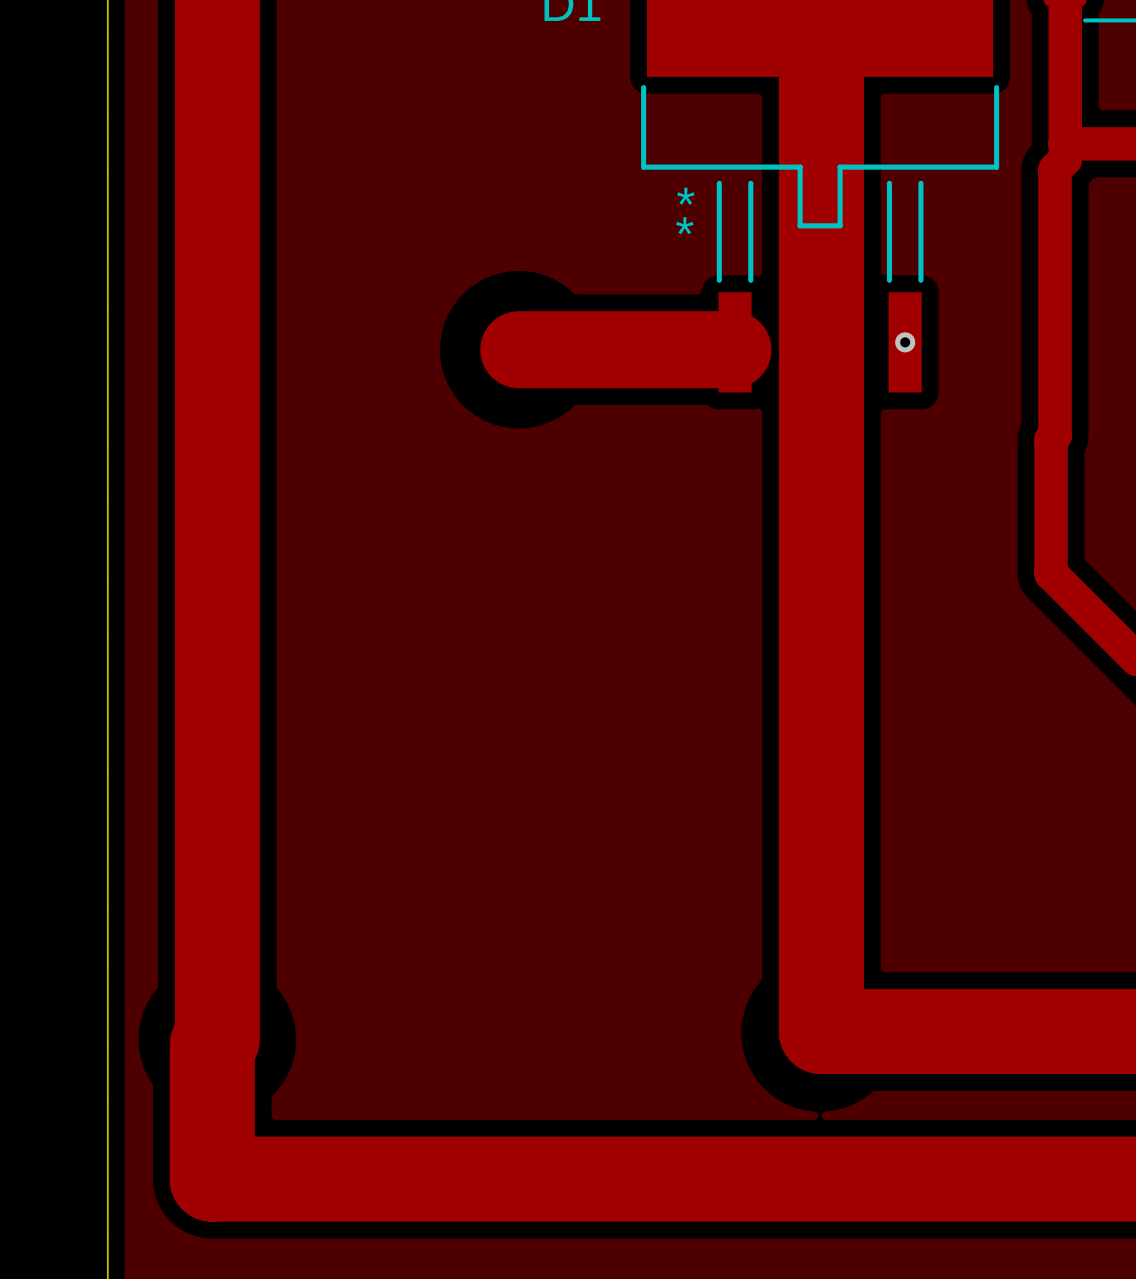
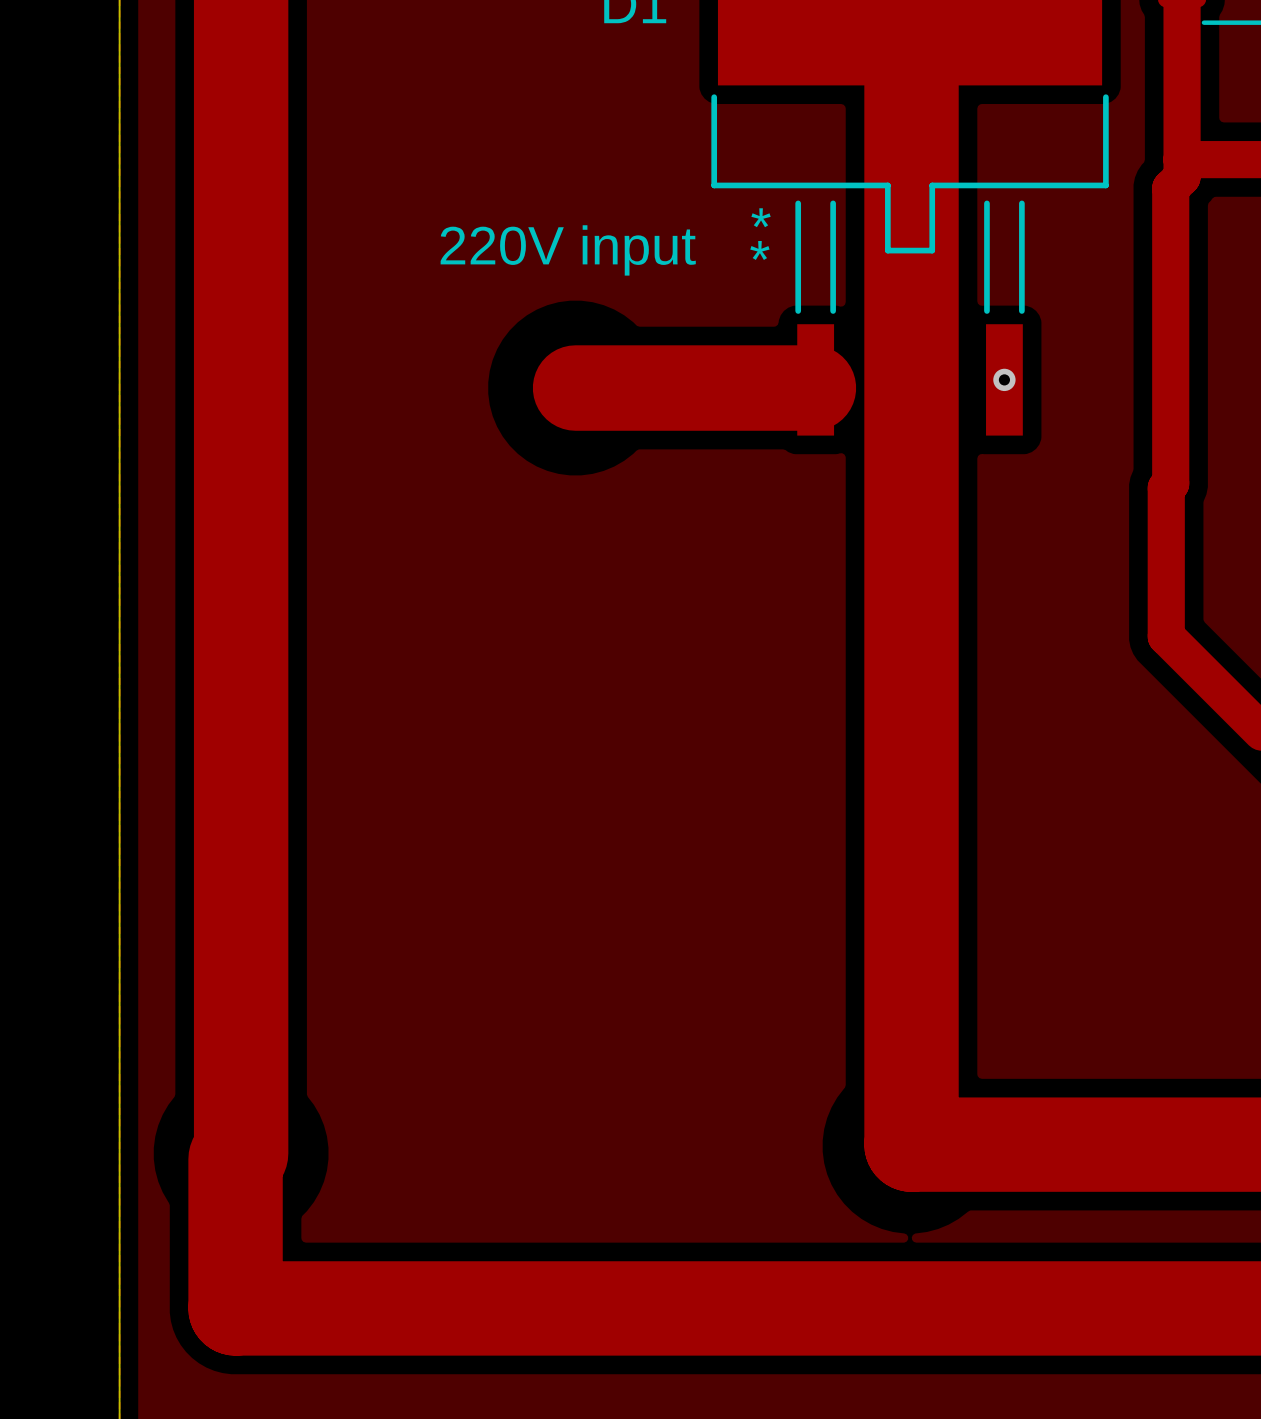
text: none -> 220V input (568, 250)

